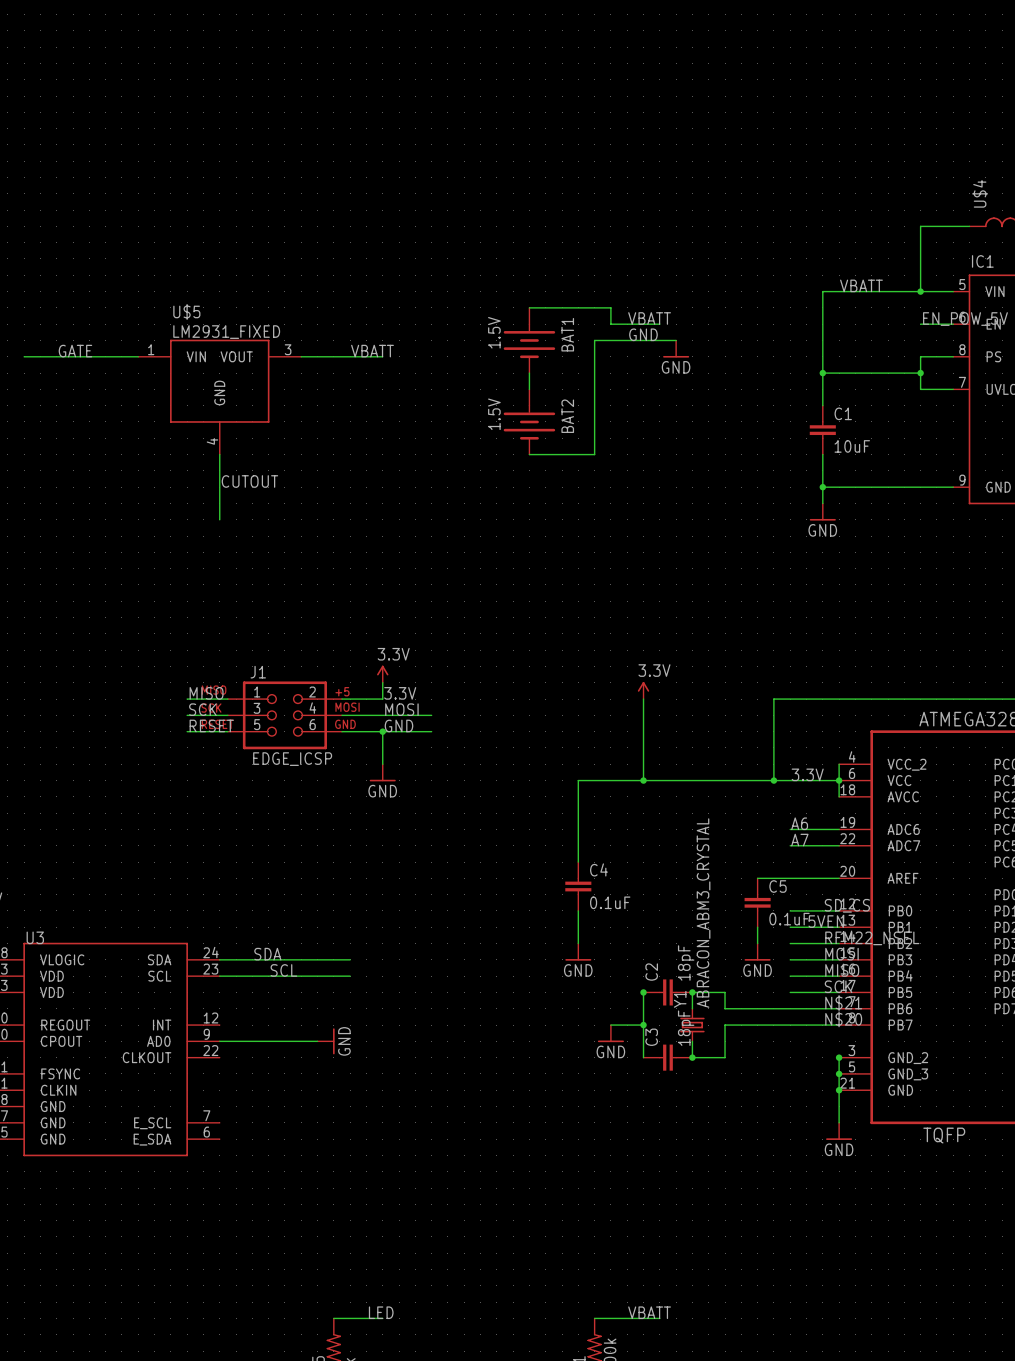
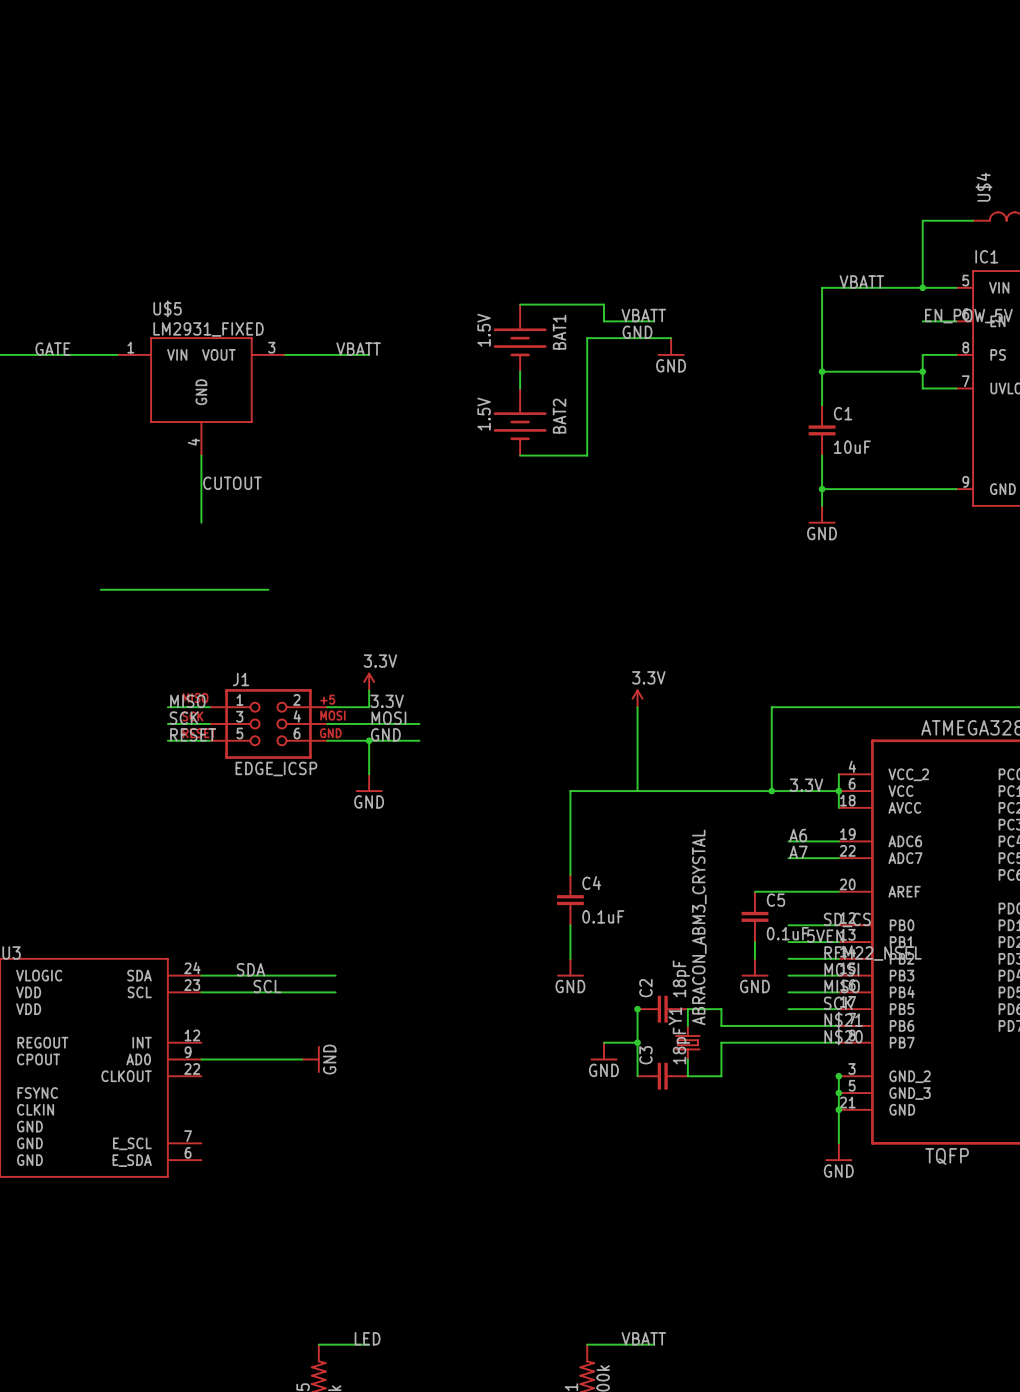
wire: none -> (100, 589) (268, 589)
junction: (643, 780) -> none
junction: (692, 992) -> none
junction: (692, 1057) -> none

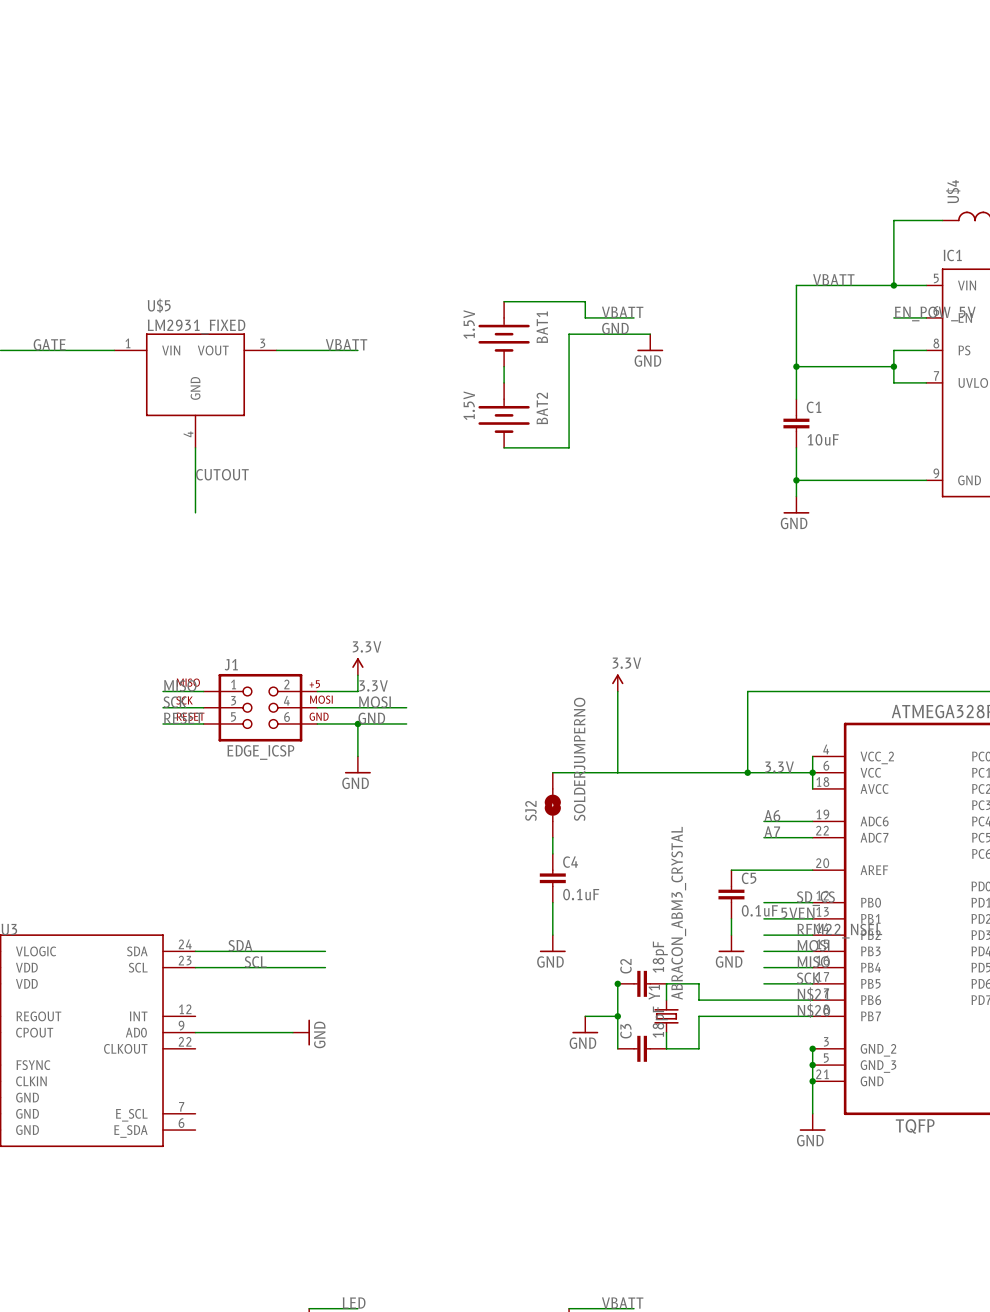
wire: (100, 589) (268, 589) -> none
SJ2: none -> SOLDERJUMPERNO (552, 805)

